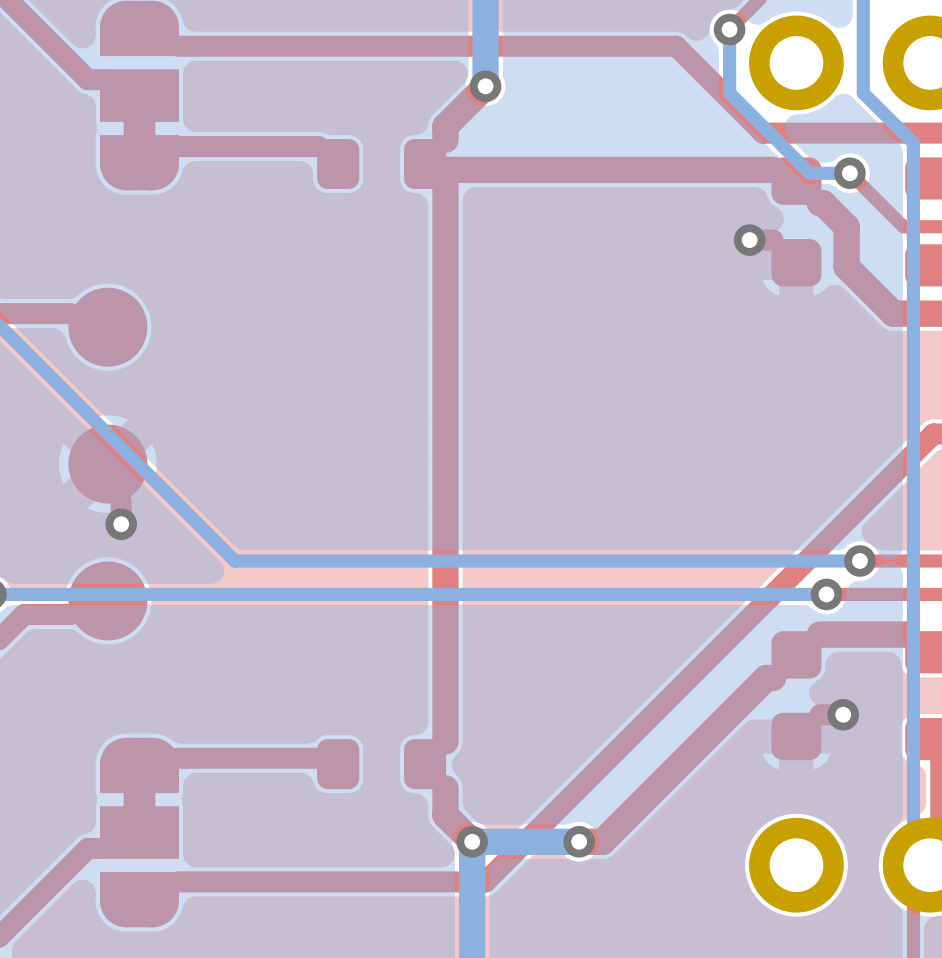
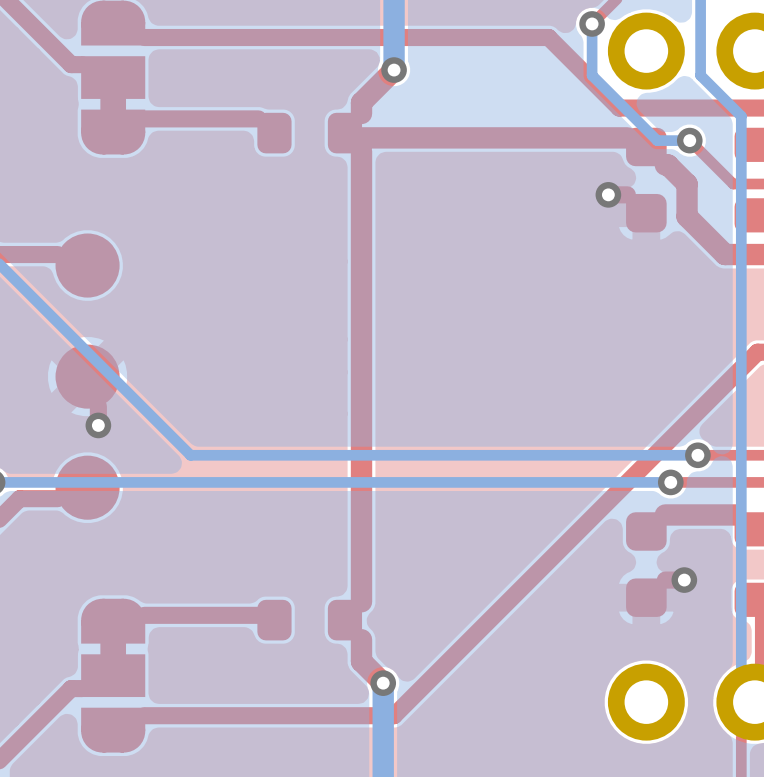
top track: (773, 678) (766, 678) (602, 841) (579, 841) -> none
bottom track: (579, 841) (472, 841) -> none
via: (579, 841) -> none

